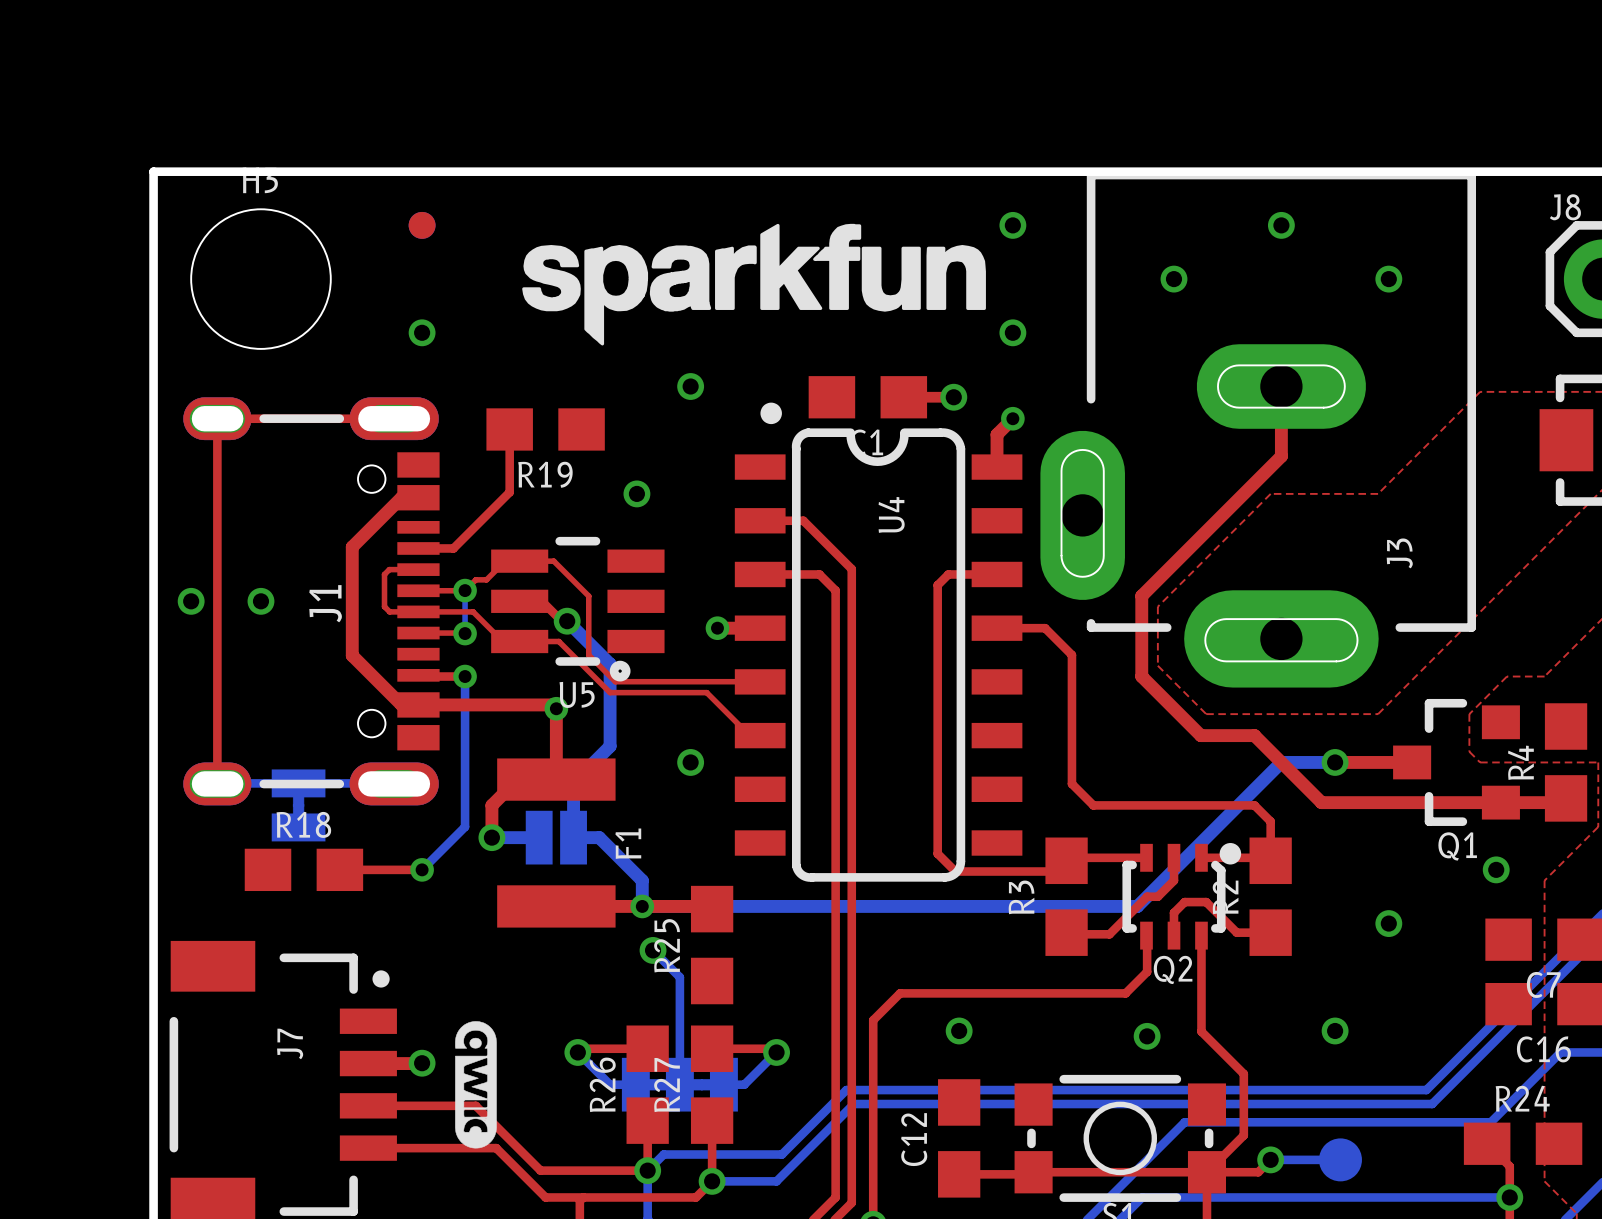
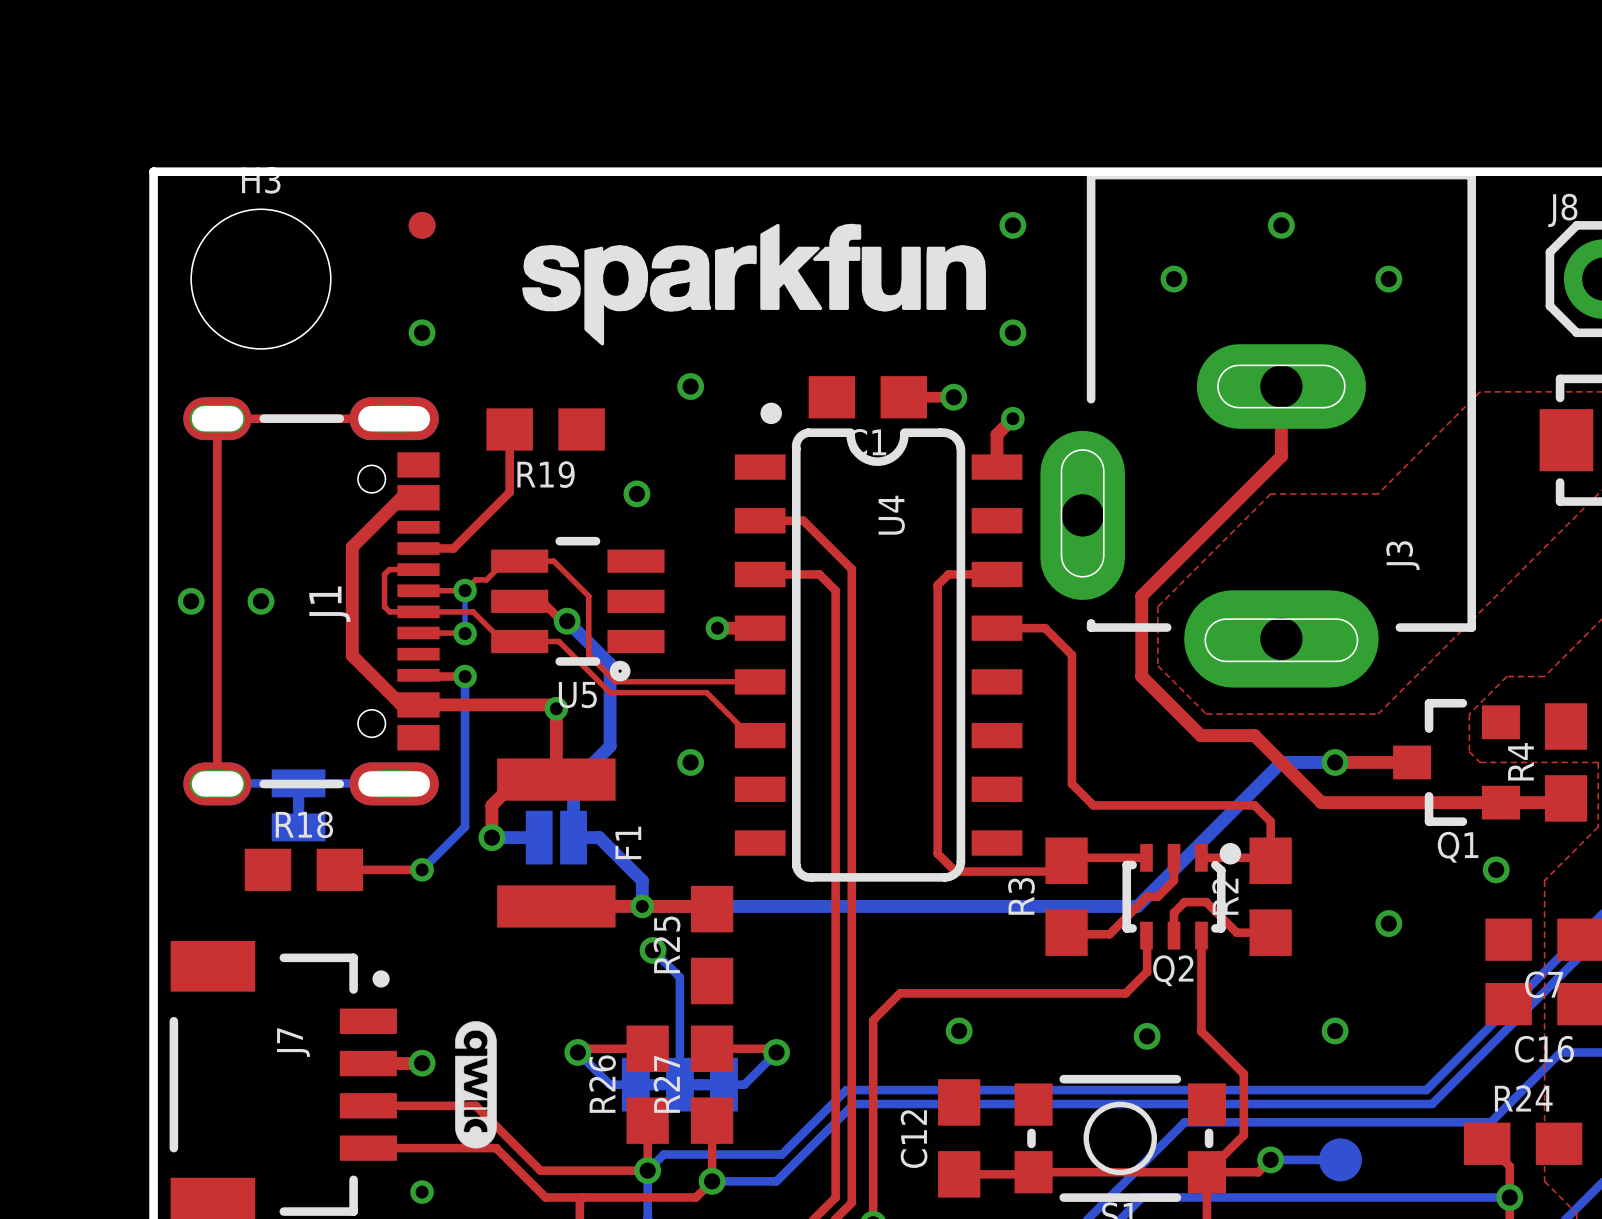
via: none -> (422, 1192)

